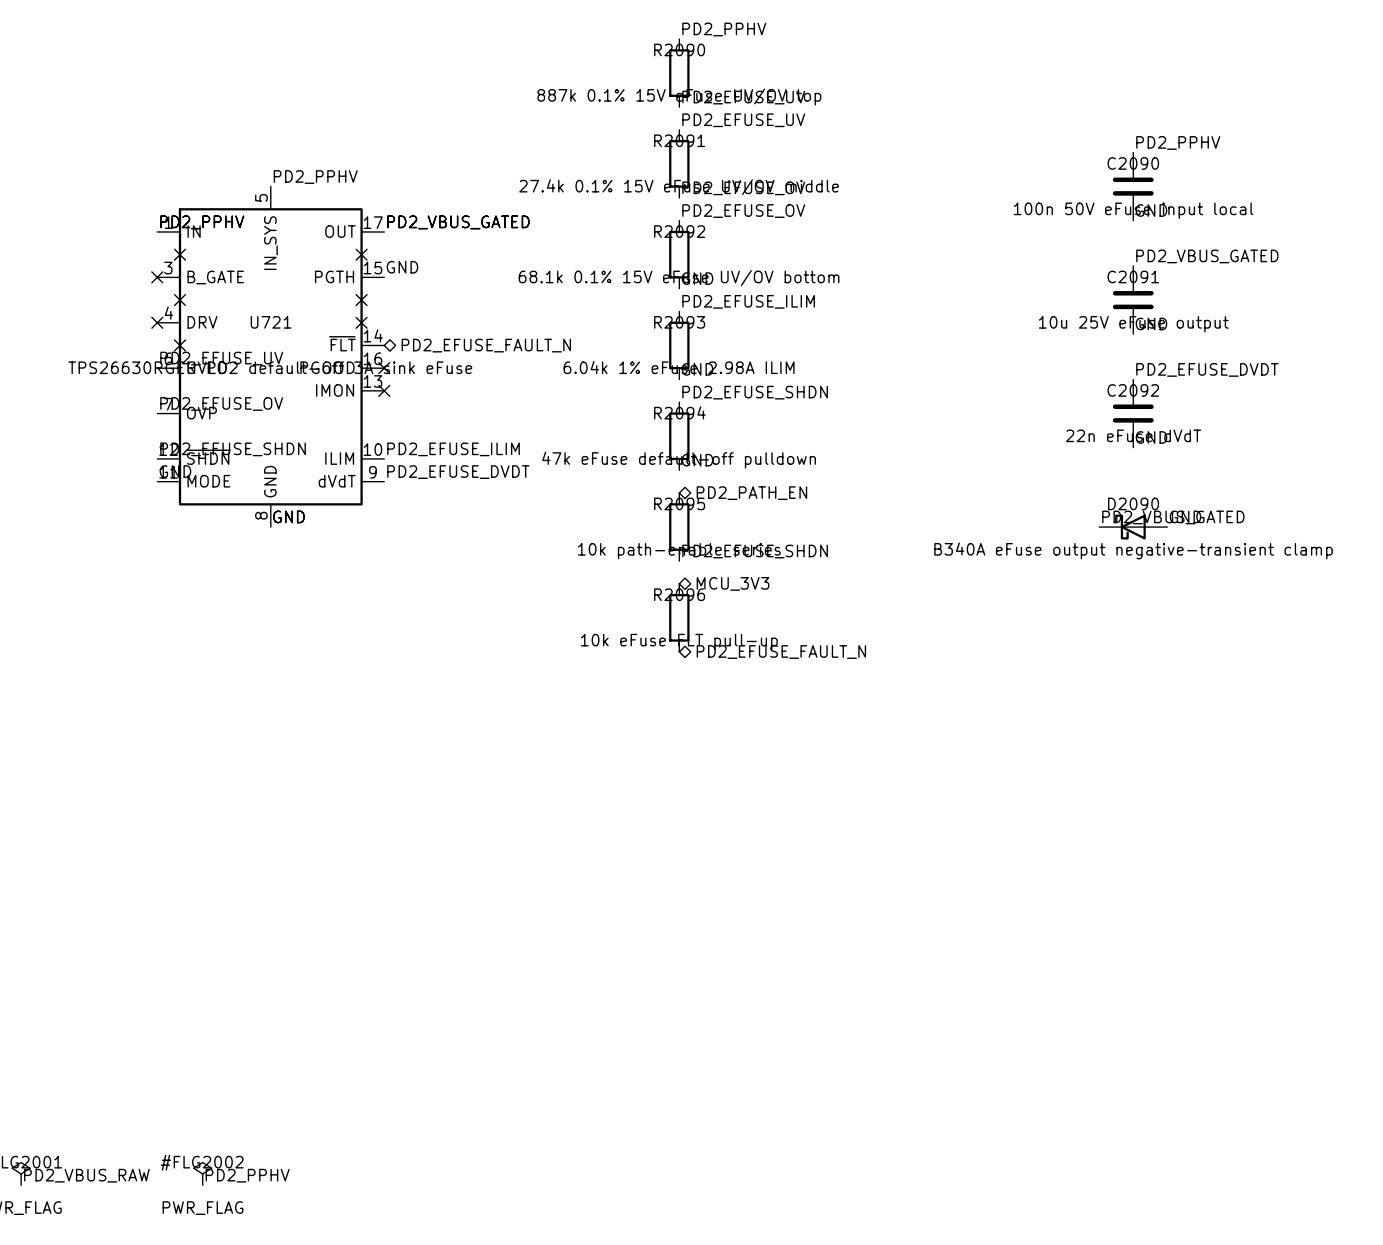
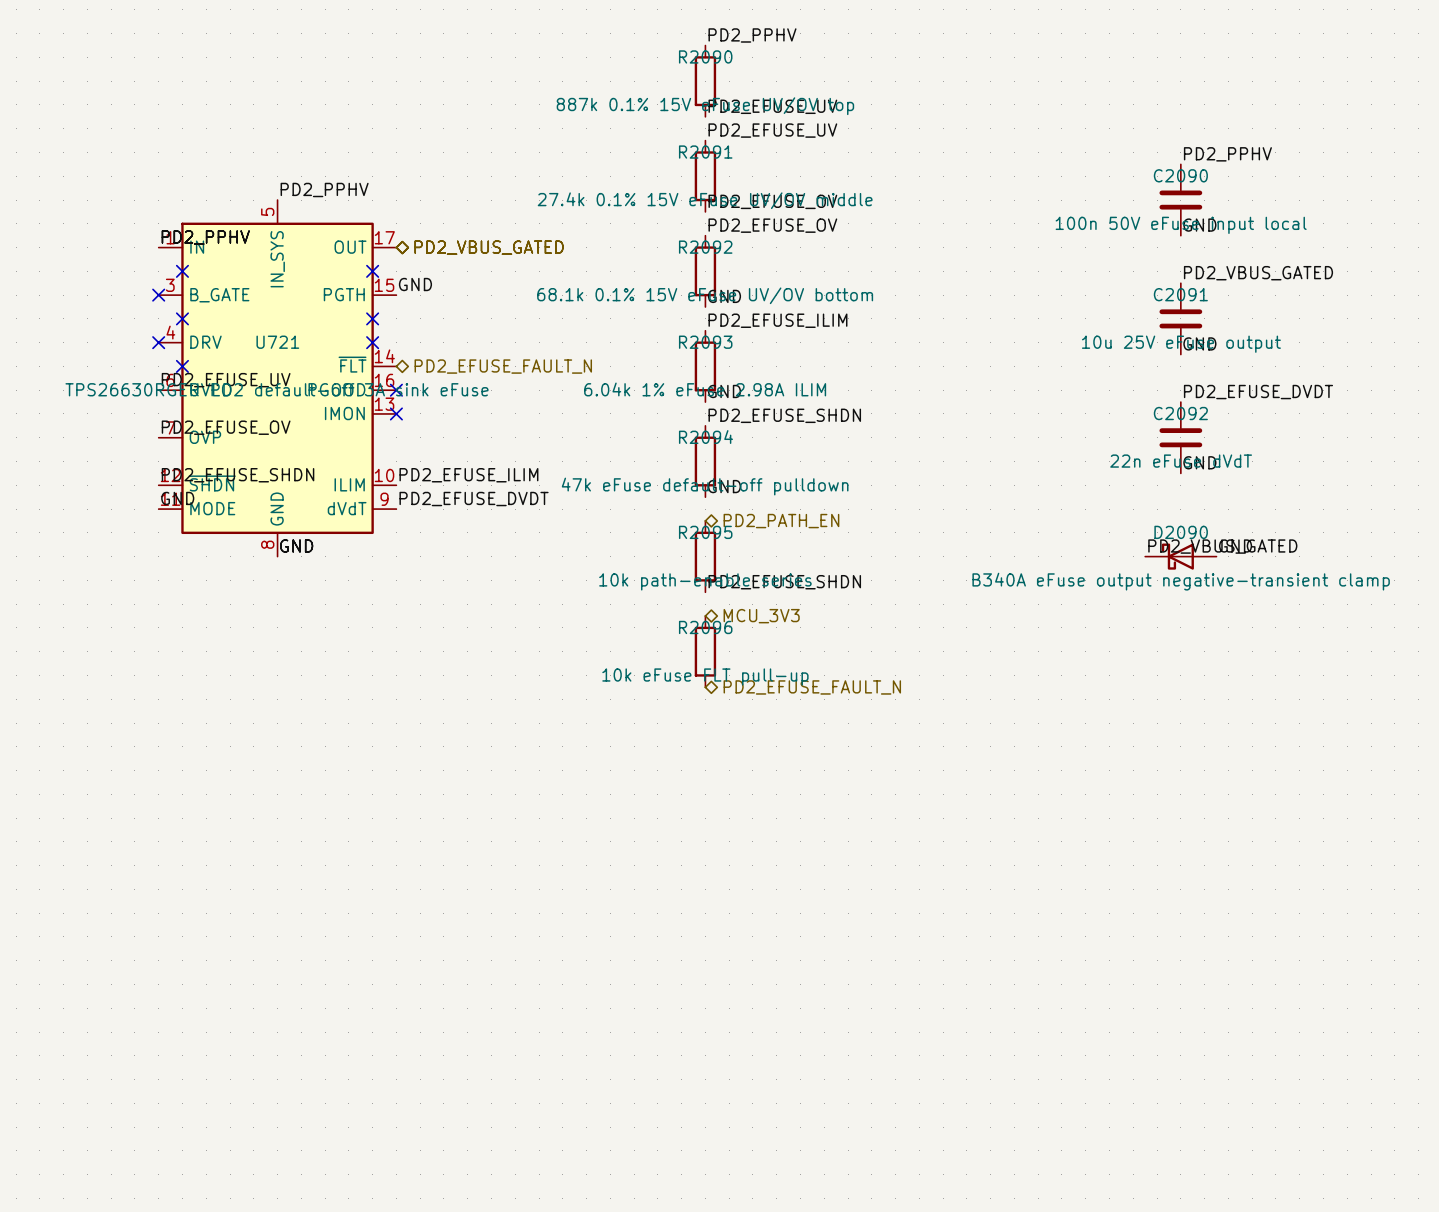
label: PD2_VBUS_GATED (458, 222) -> none
hierarchical label: none -> PD2_VBUS_GATED (489, 247)

